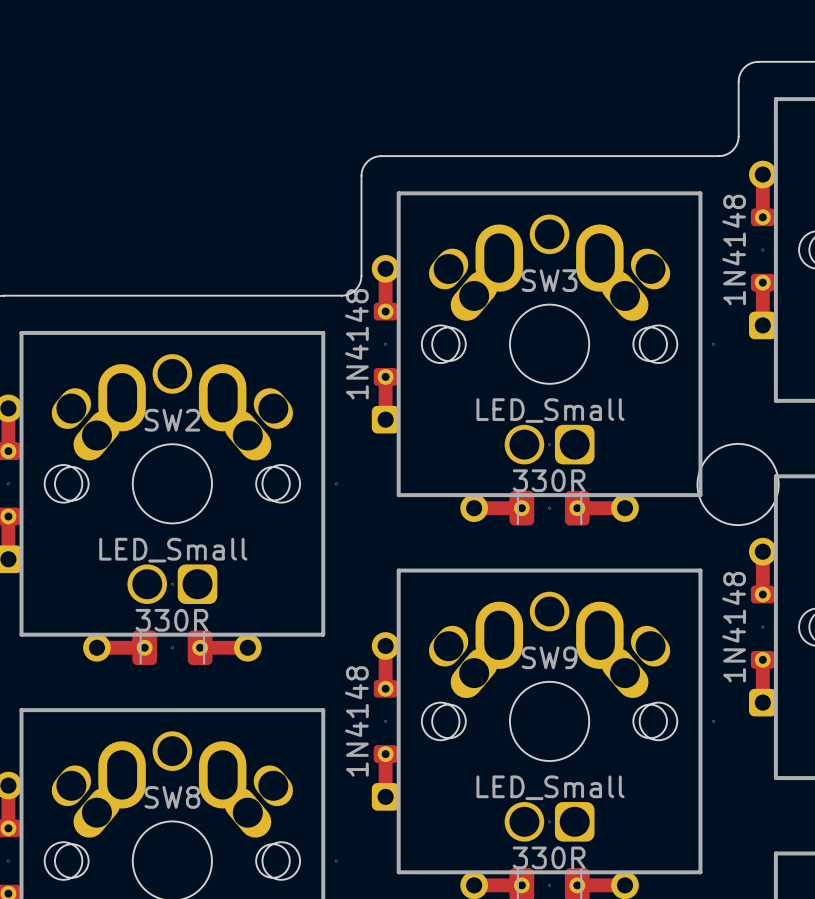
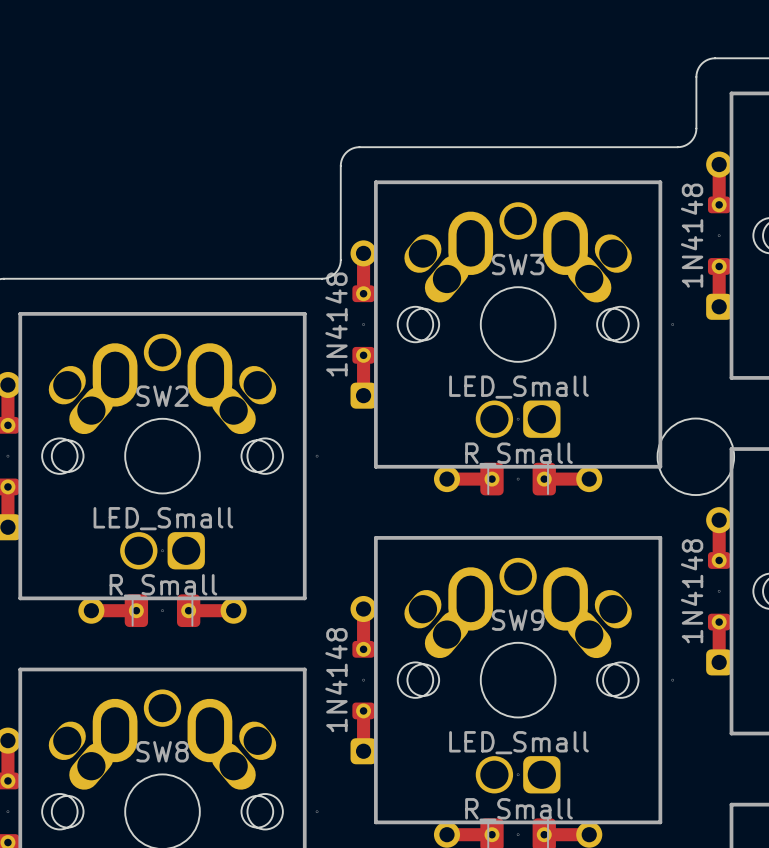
part value: 330R (549, 480) -> R_Small (519, 454)
part value: 330R (171, 620) -> R_Small (163, 585)
part value: 330R (549, 857) -> R_Small (519, 809)

